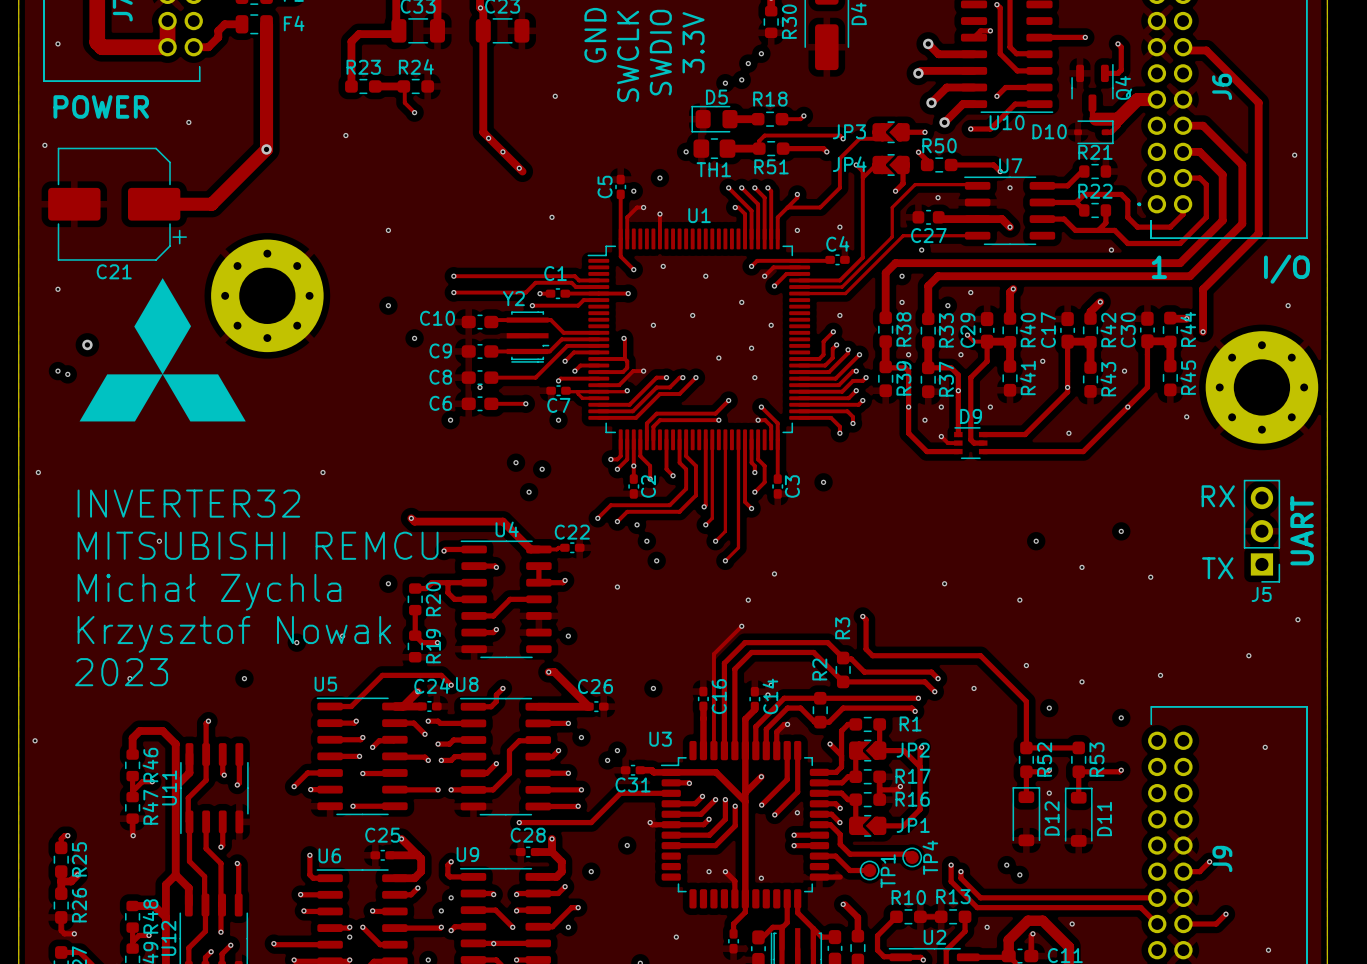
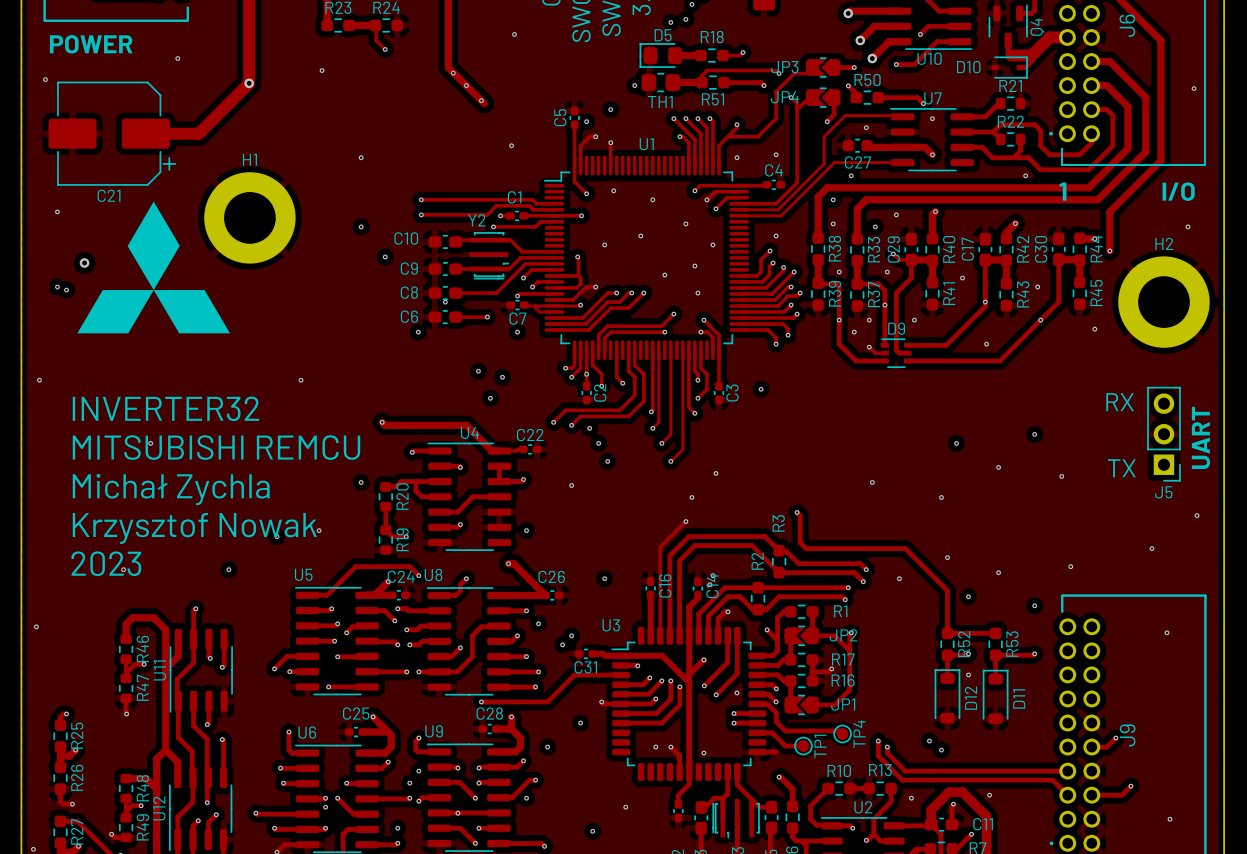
part: (267, 295) -> none
H1: none -> (249, 217)
part: (1261, 387) -> none
H2: none -> (1163, 302)

